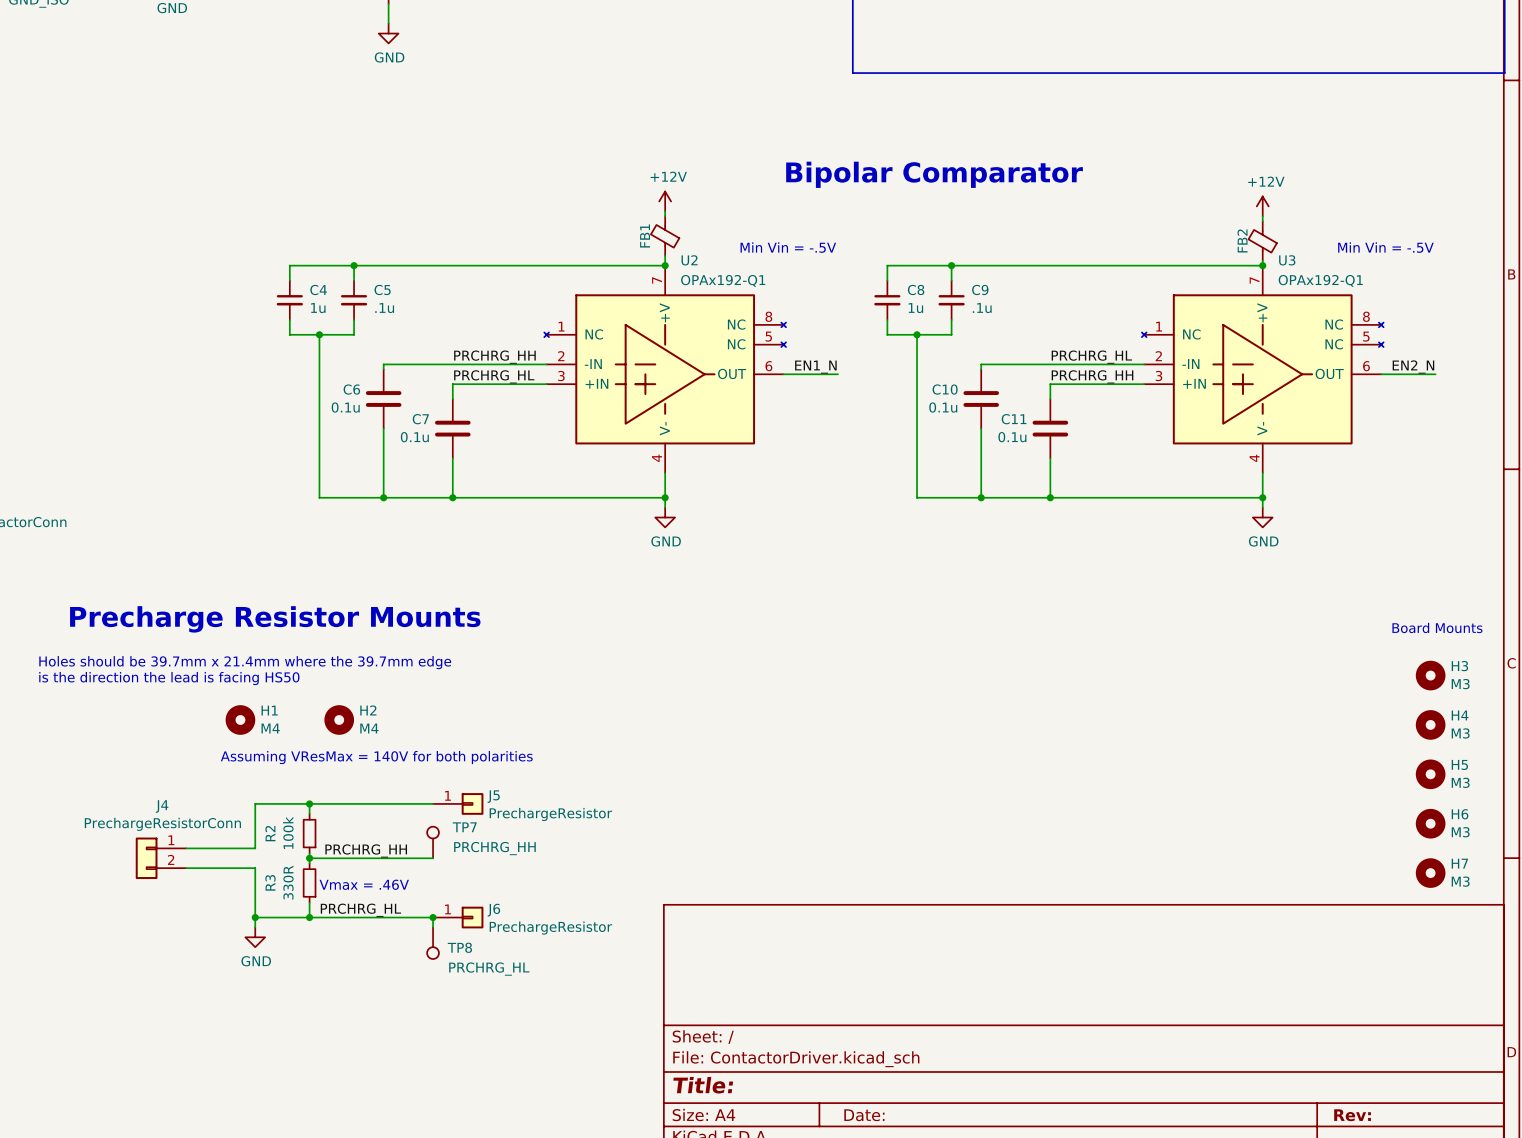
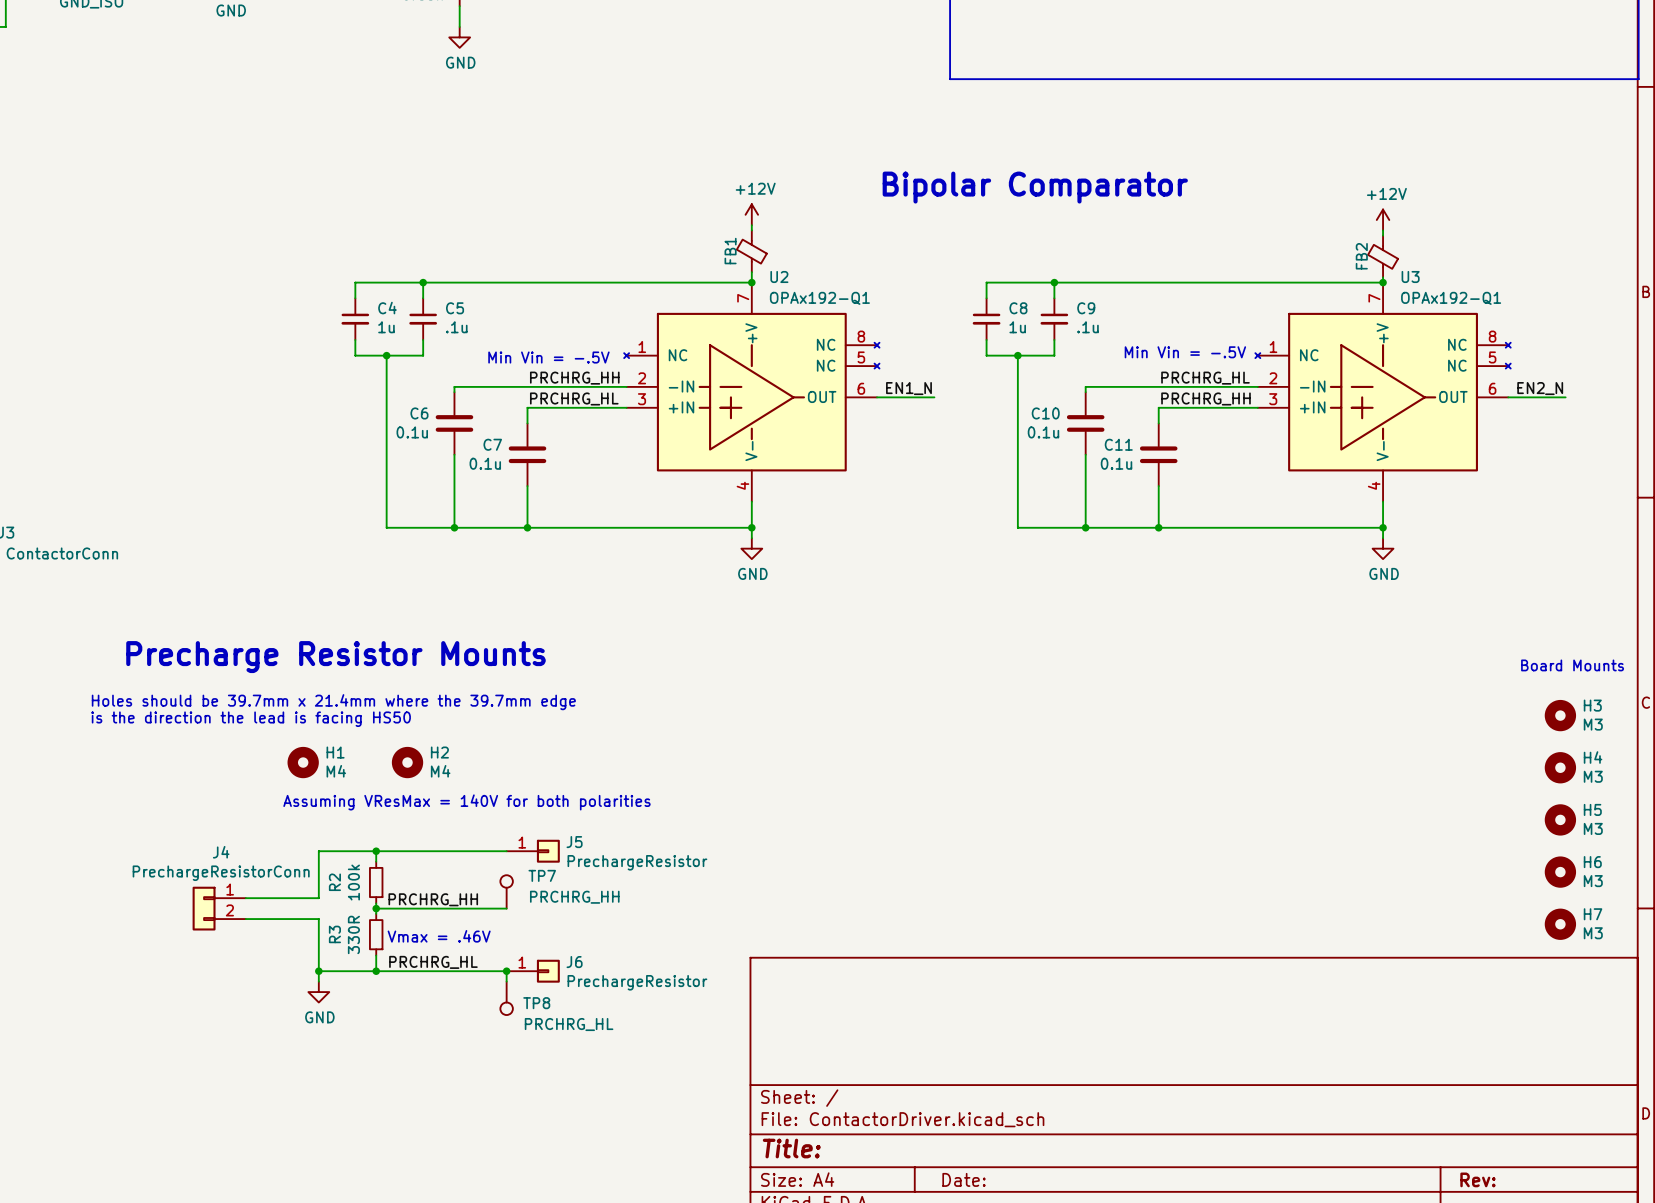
text: Min Vin = -.5V (788, 247) -> none
text: Min Vin = -.5V (1385, 247) -> none
text: none -> Min Vin = -.5V (1185, 352)
text: none -> Min Vin = -.5V (548, 357)

